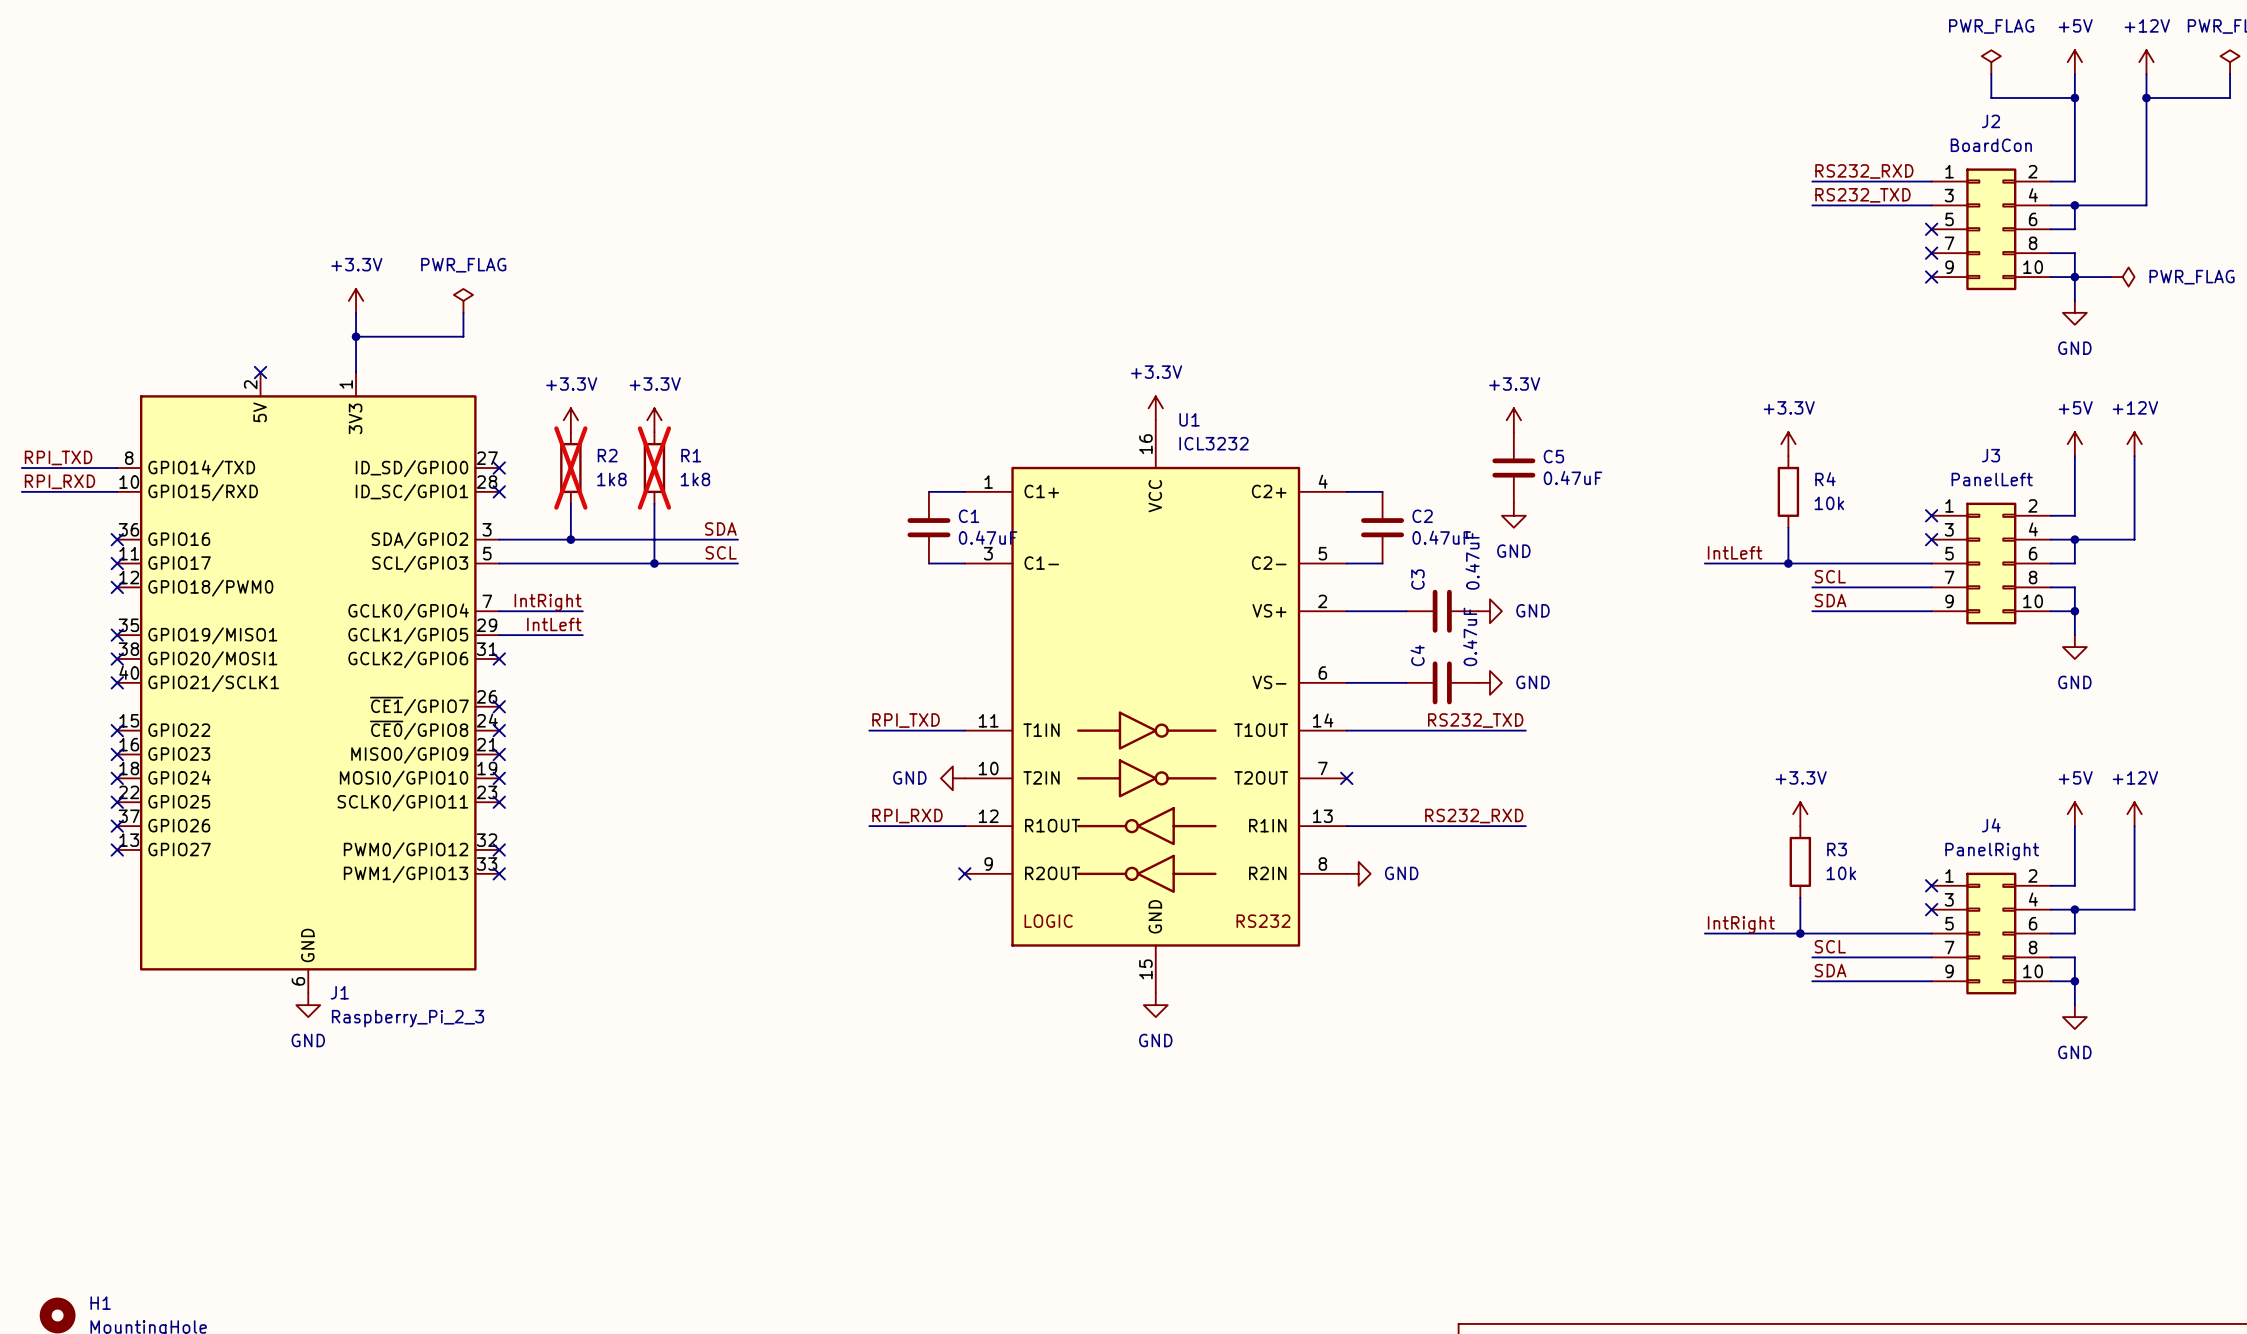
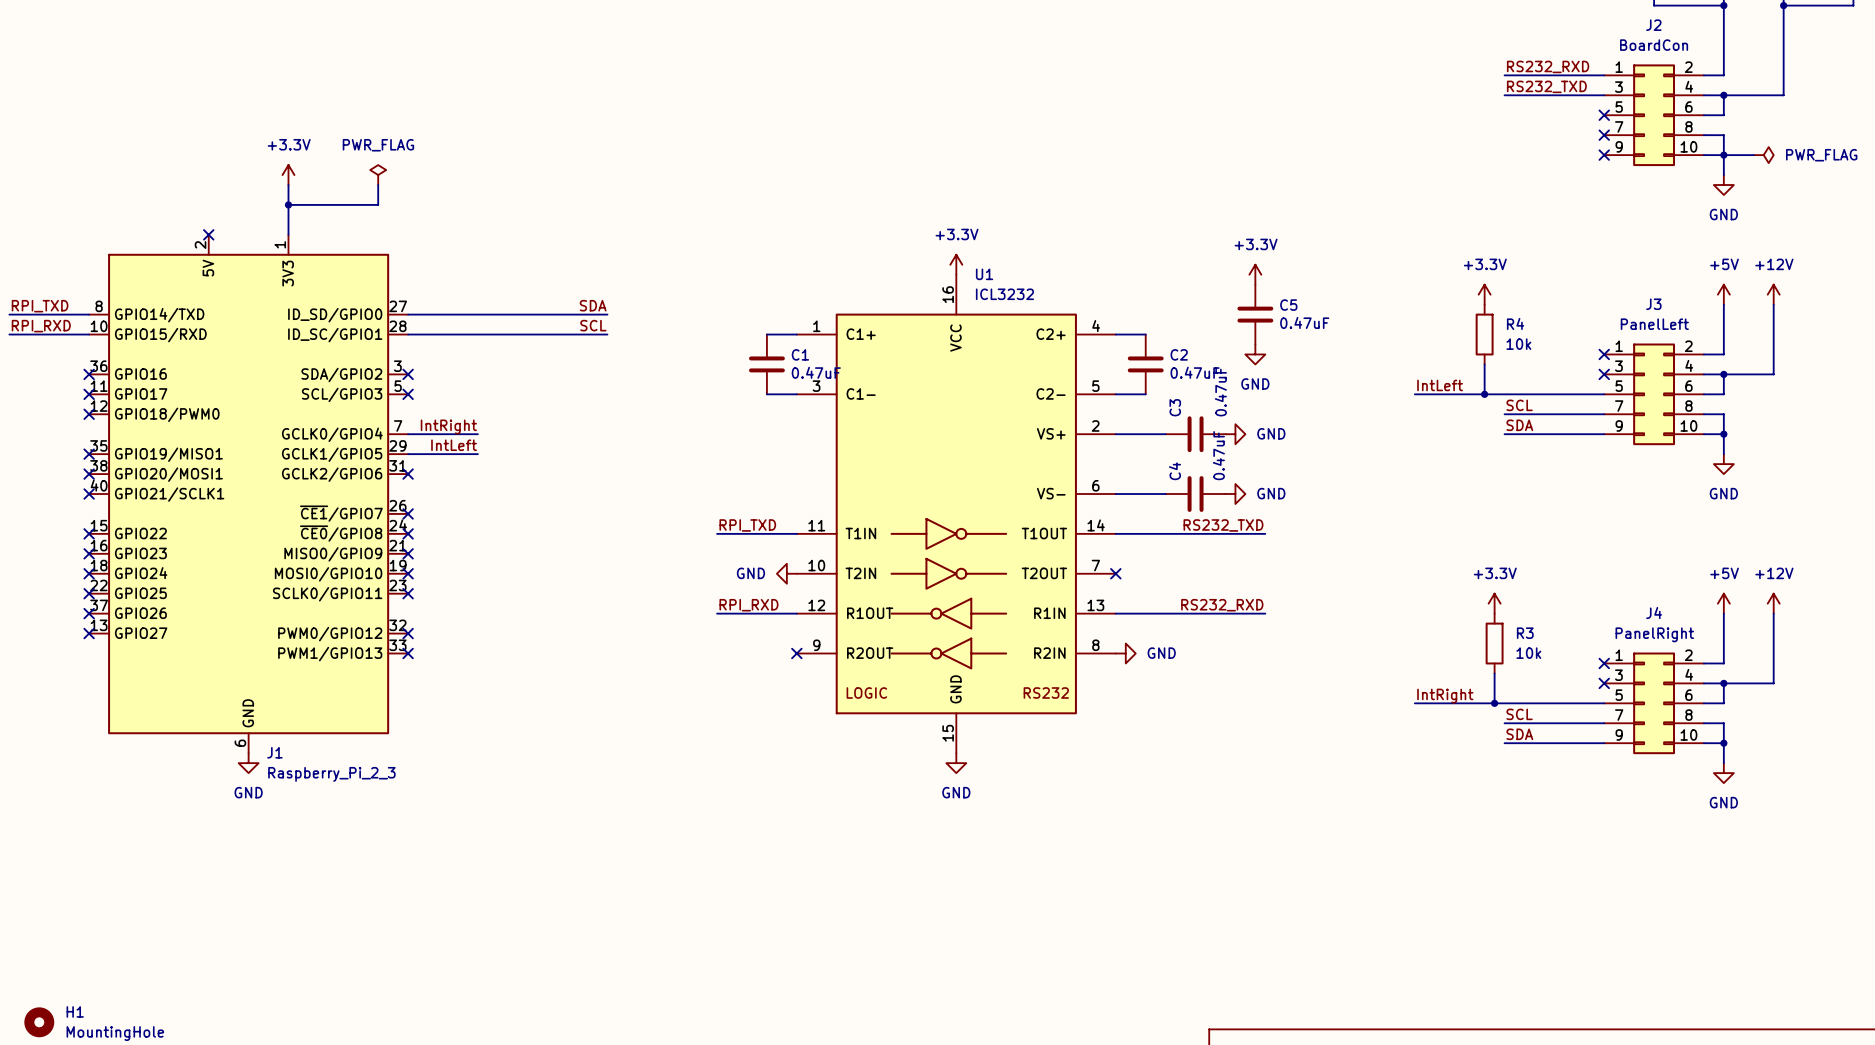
power symbol: +3.3V (570, 420) -> none
power symbol: +3.3V (654, 420) -> none
no-connect mark: (499, 468) -> none
R2: 1k8 (570, 468) -> none
R1: 1k8 (654, 468) -> none
no-connect mark: (499, 491) -> none
wire: (570, 503) (570, 539) -> none
wire: (654, 503) (654, 563) -> none
label position: SDA (720, 528) -> SDA (593, 305)
wire: (499, 539) (737, 539) -> (408, 314) (607, 314)
no-connect mark: none -> (408, 374)
junction: (570, 539) -> none
label position: SCL (721, 552) -> SCL (593, 325)
wire: (499, 563) (737, 563) -> (408, 334) (607, 334)
no-connect mark: none -> (408, 394)
junction: (654, 563) -> none

